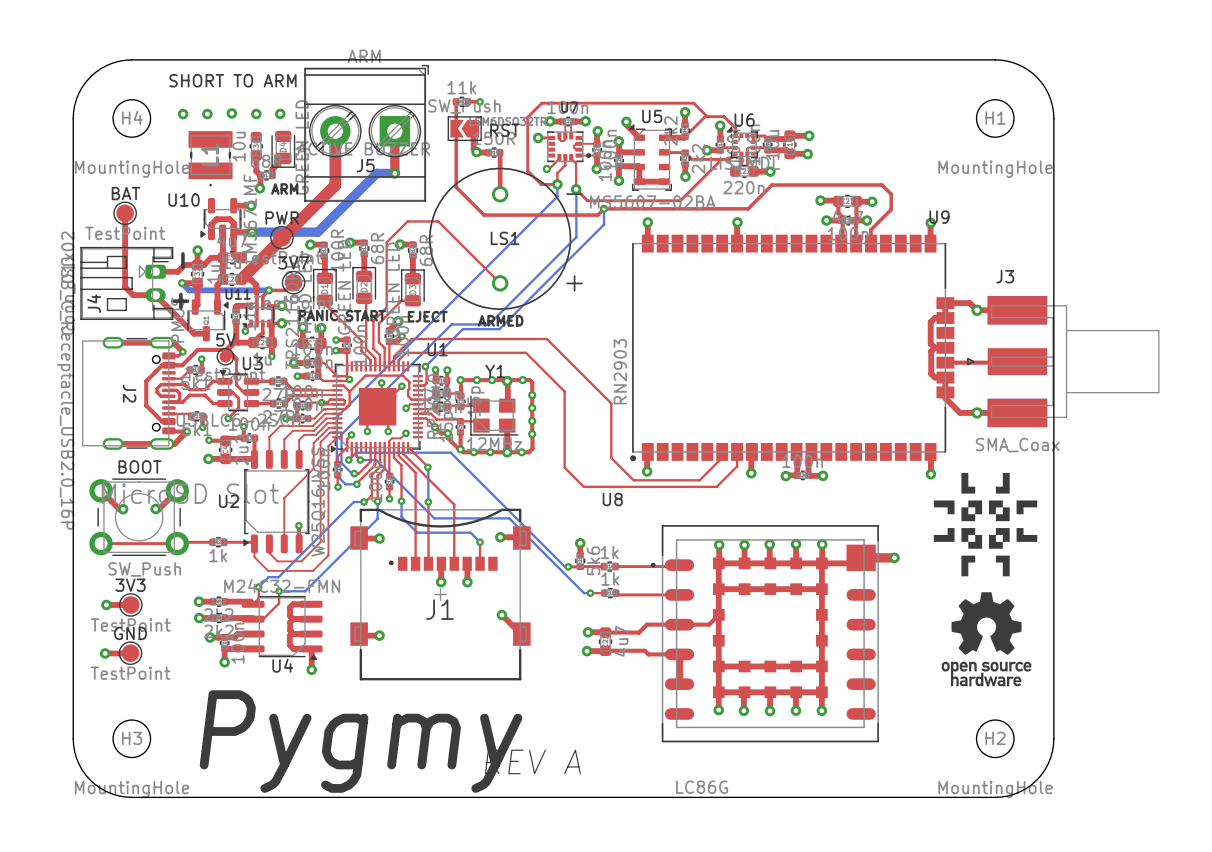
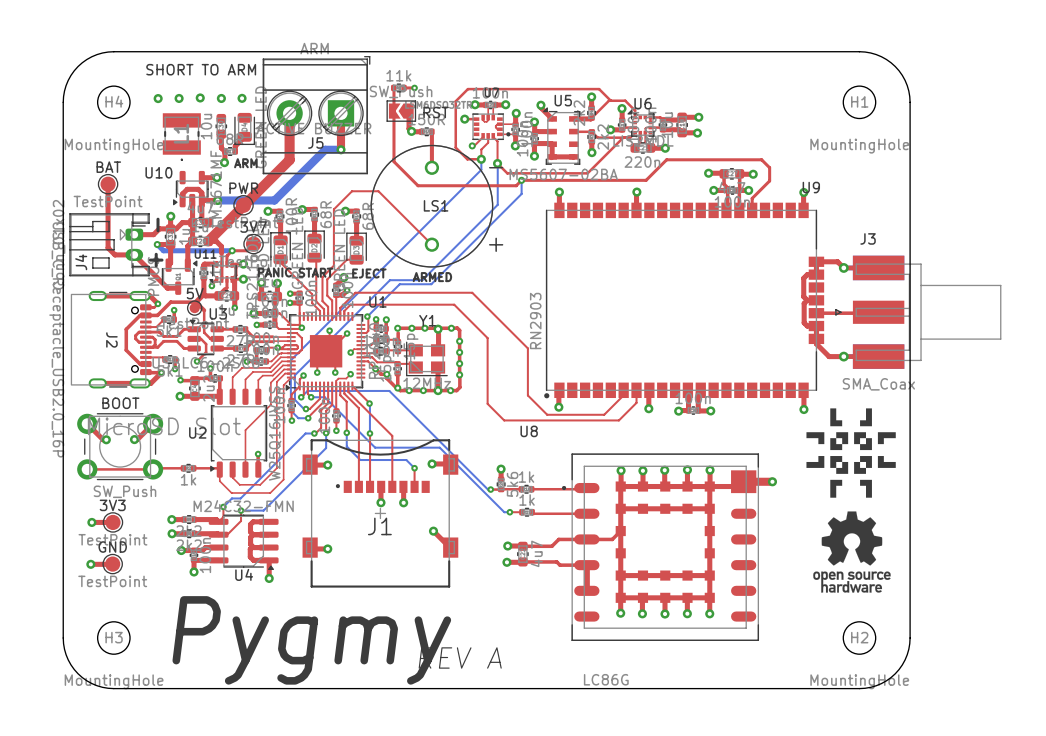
top track: (349, 391) (365, 375) (402, 375) (409, 381) (408, 396) (411, 399) (417, 399) -> none

